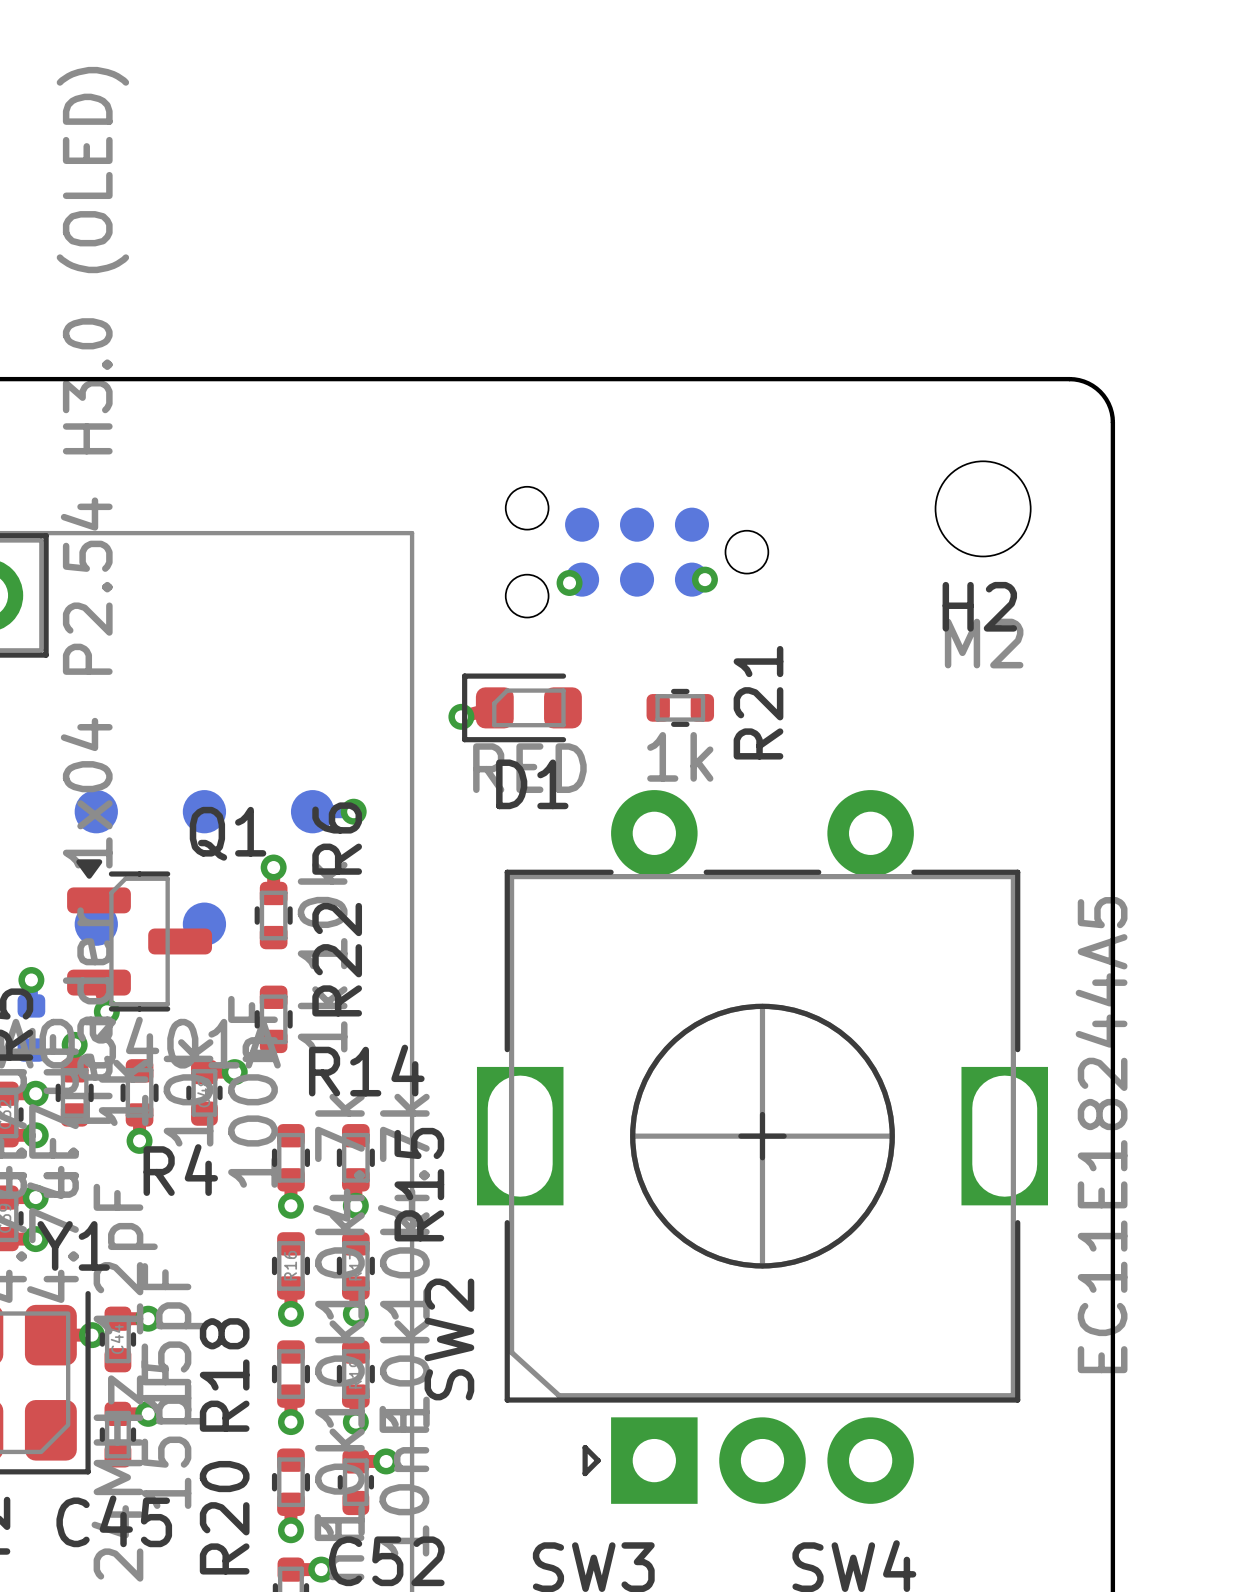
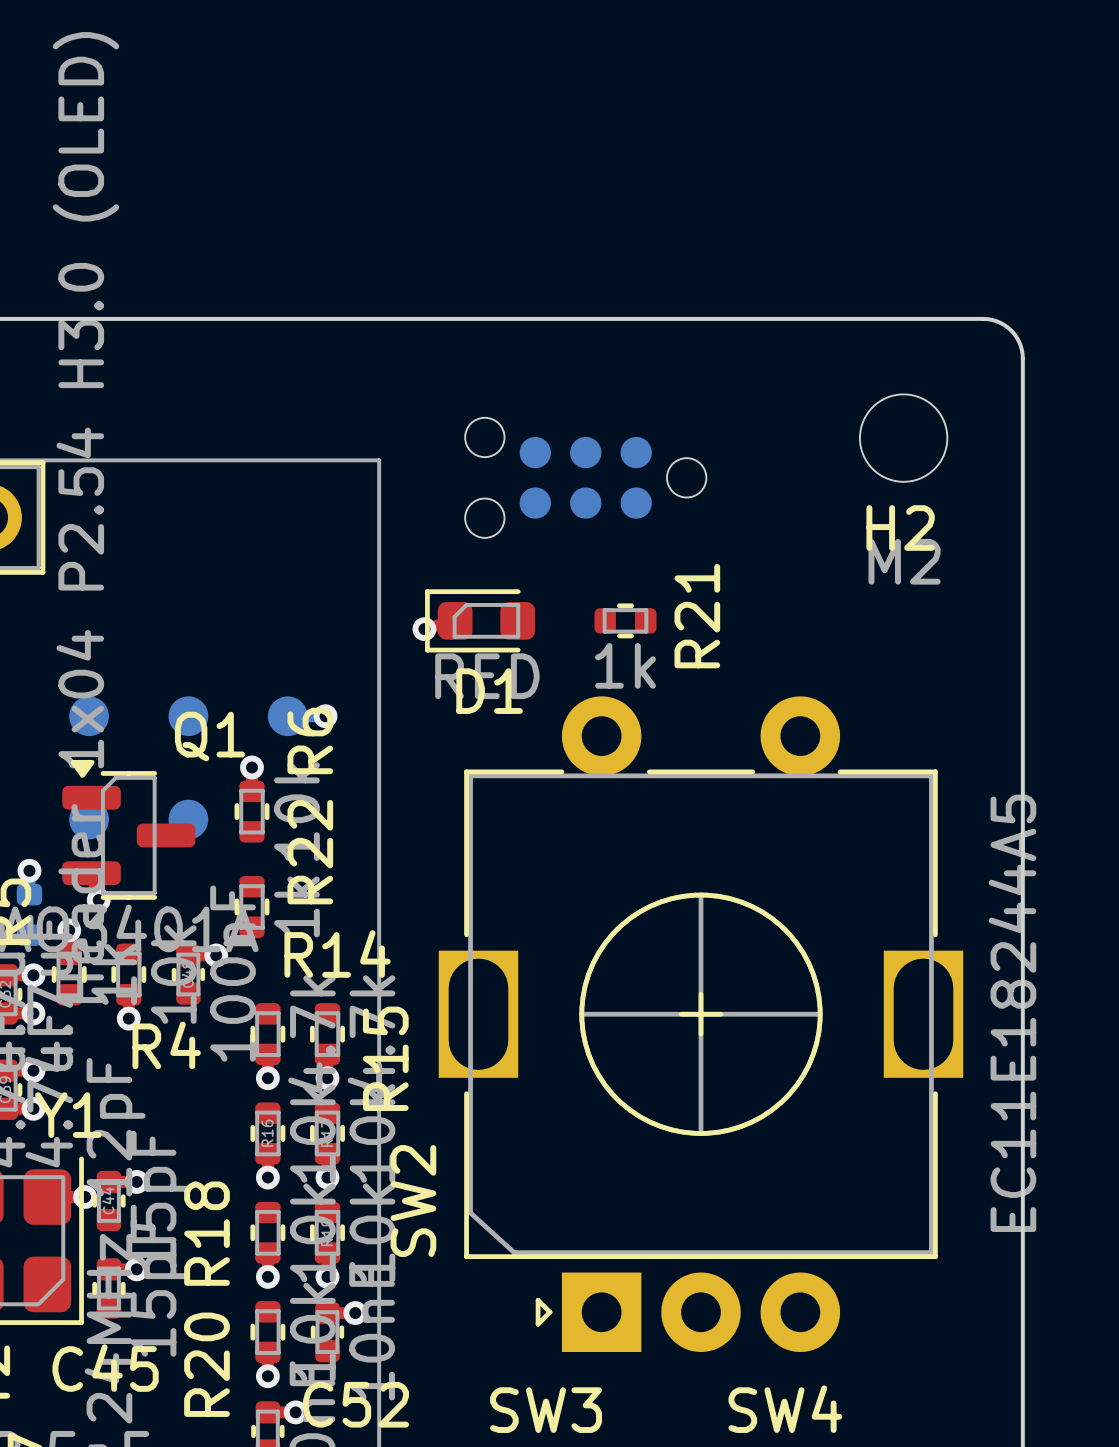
via: (704, 579) -> none
via: (569, 582) -> none

